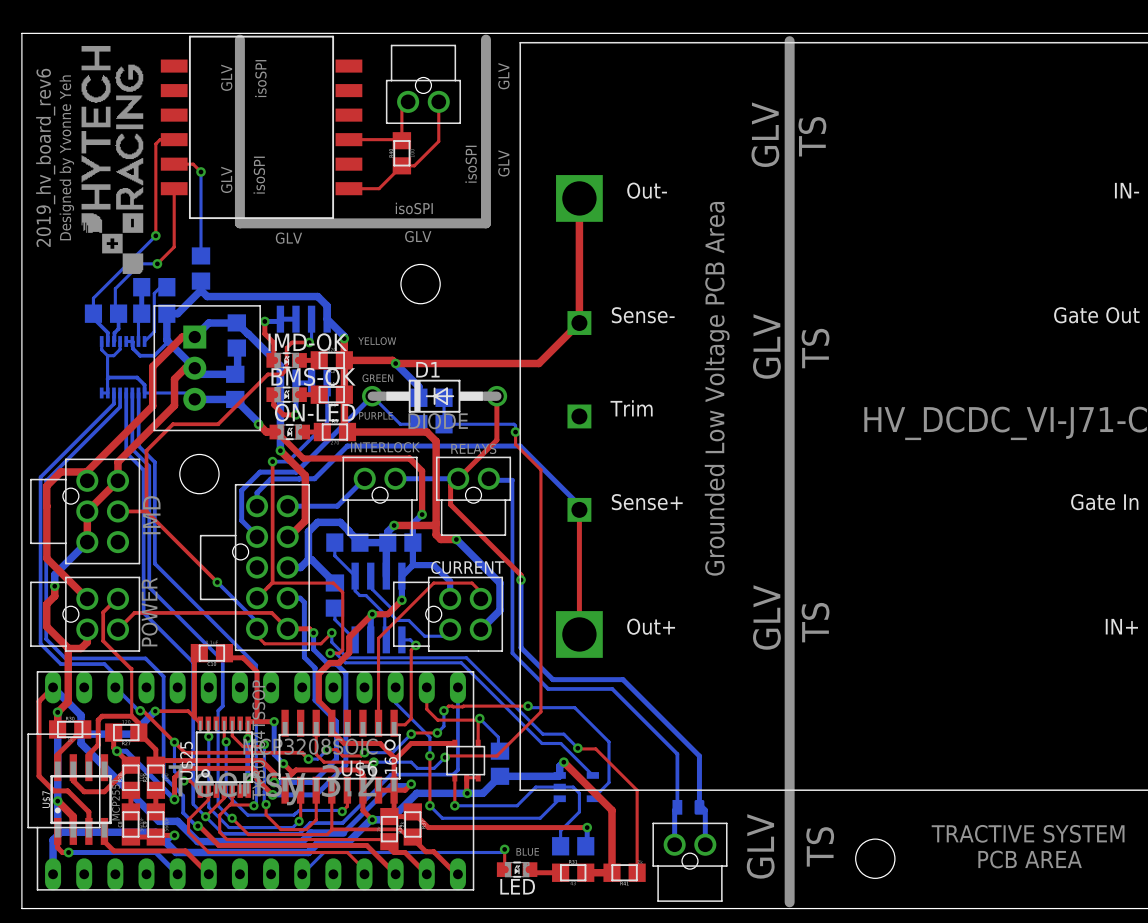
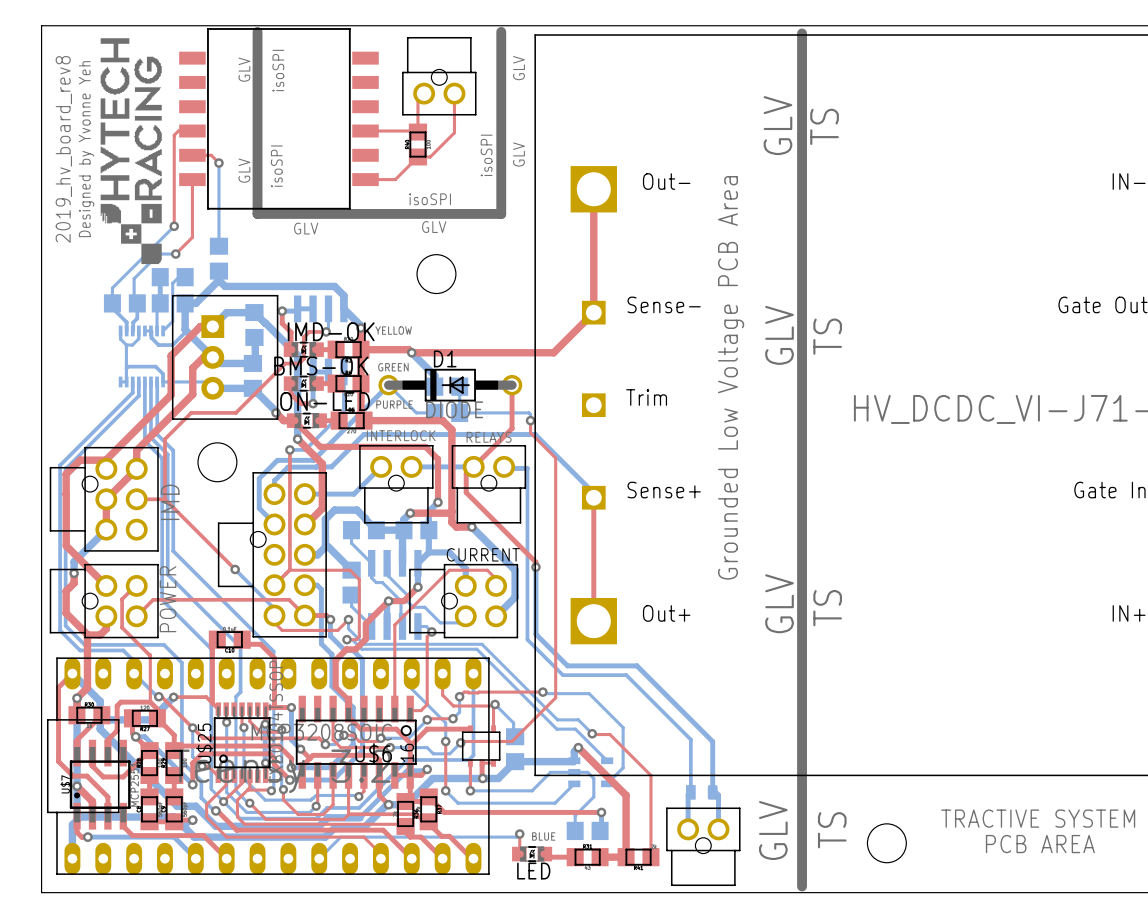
text: 2019_hv_board_rev6 (45, 157) -> 2019_hv_board_rev8 (63, 149)

